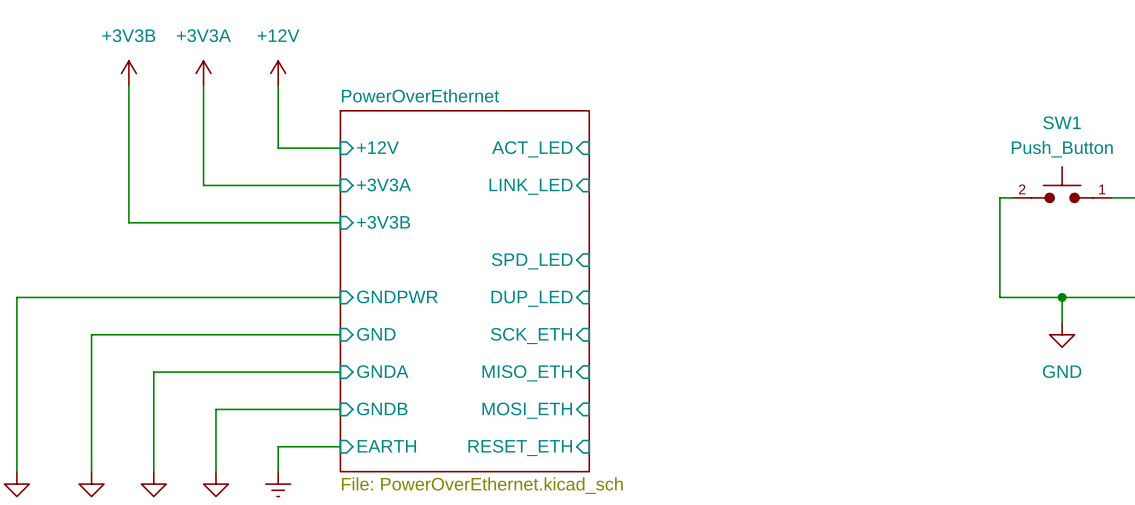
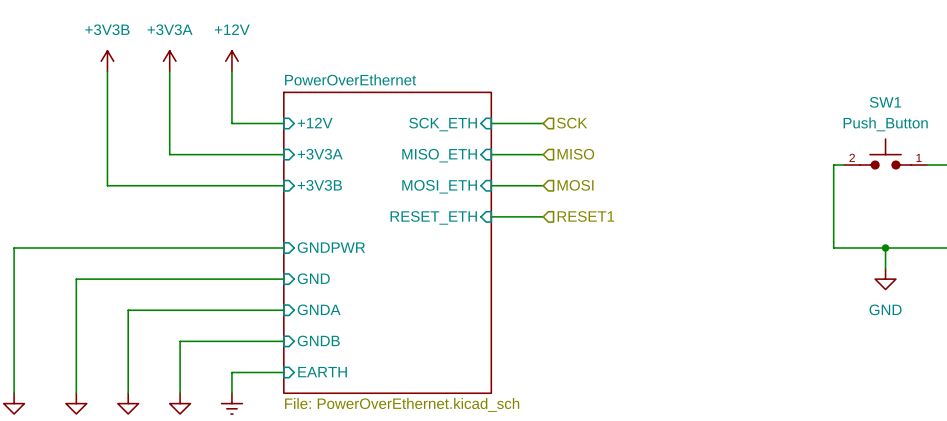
hierarchical label: none -> SCK (572, 123)
wire: none -> (491, 123) (543, 123)
sheet pin: ACT_LED (532, 149) -> SCK_ETH (443, 124)
hierarchical label: none -> MISO (575, 154)
wire: none -> (491, 154) (543, 154)
sheet pin: LINK_LED (531, 186) -> MISO_ETH (439, 155)
wire: none -> (491, 185) (543, 185)
hierarchical label: none -> MOSI (575, 185)
hierarchical label: none -> RESET1 (585, 216)
wire: none -> (491, 216) (543, 216)
sheet pin: SPD_LED (532, 261) -> RESET_ETH (433, 217)
sheet pin: DUP_LED (532, 298) -> none
sheet pin: SCK_ETH (531, 336) -> none
sheet pin: MISO_ETH (527, 373) -> none
sheet pin position: MOSI_ETH (527, 410) -> MOSI_ETH (439, 186)
sheet pin: RESET_ETH (520, 448) -> none

